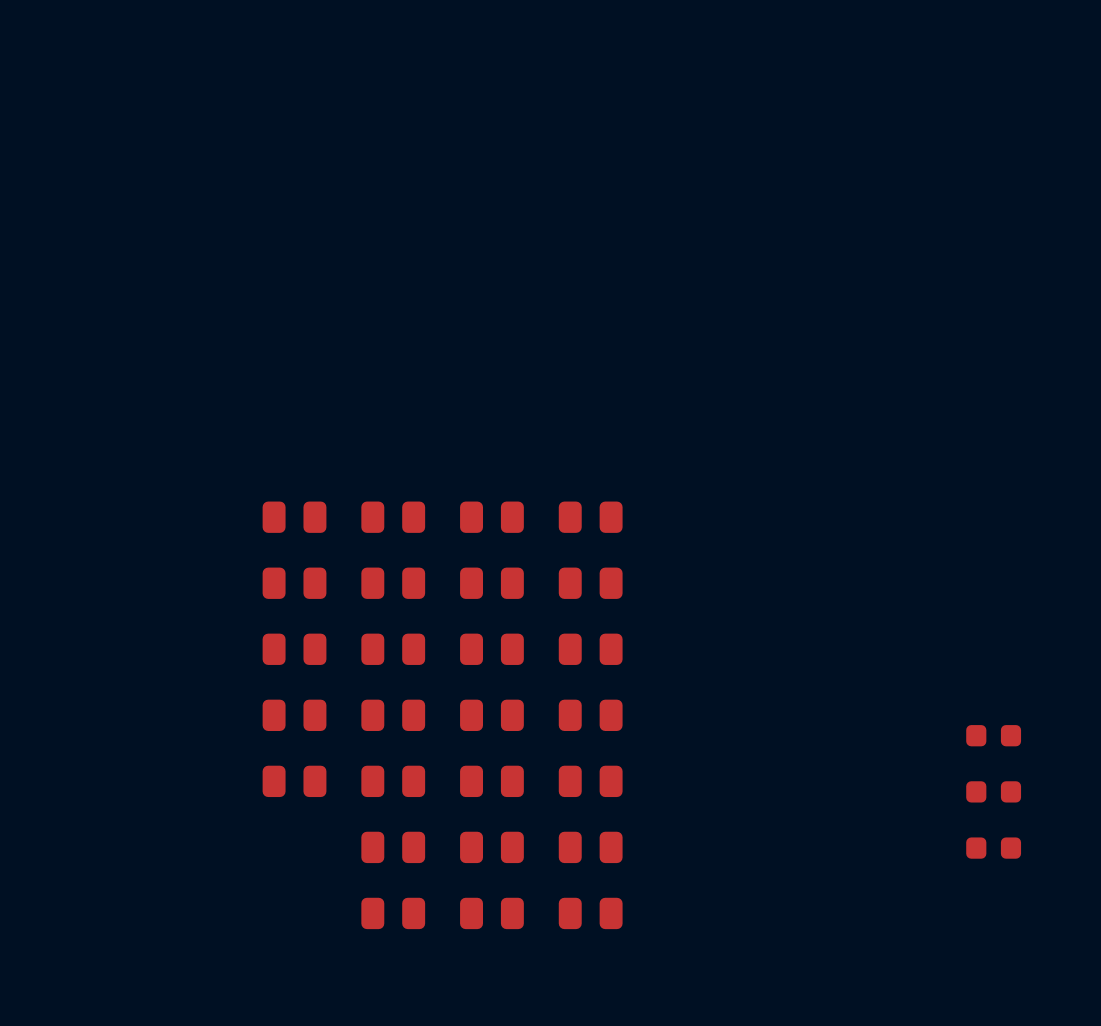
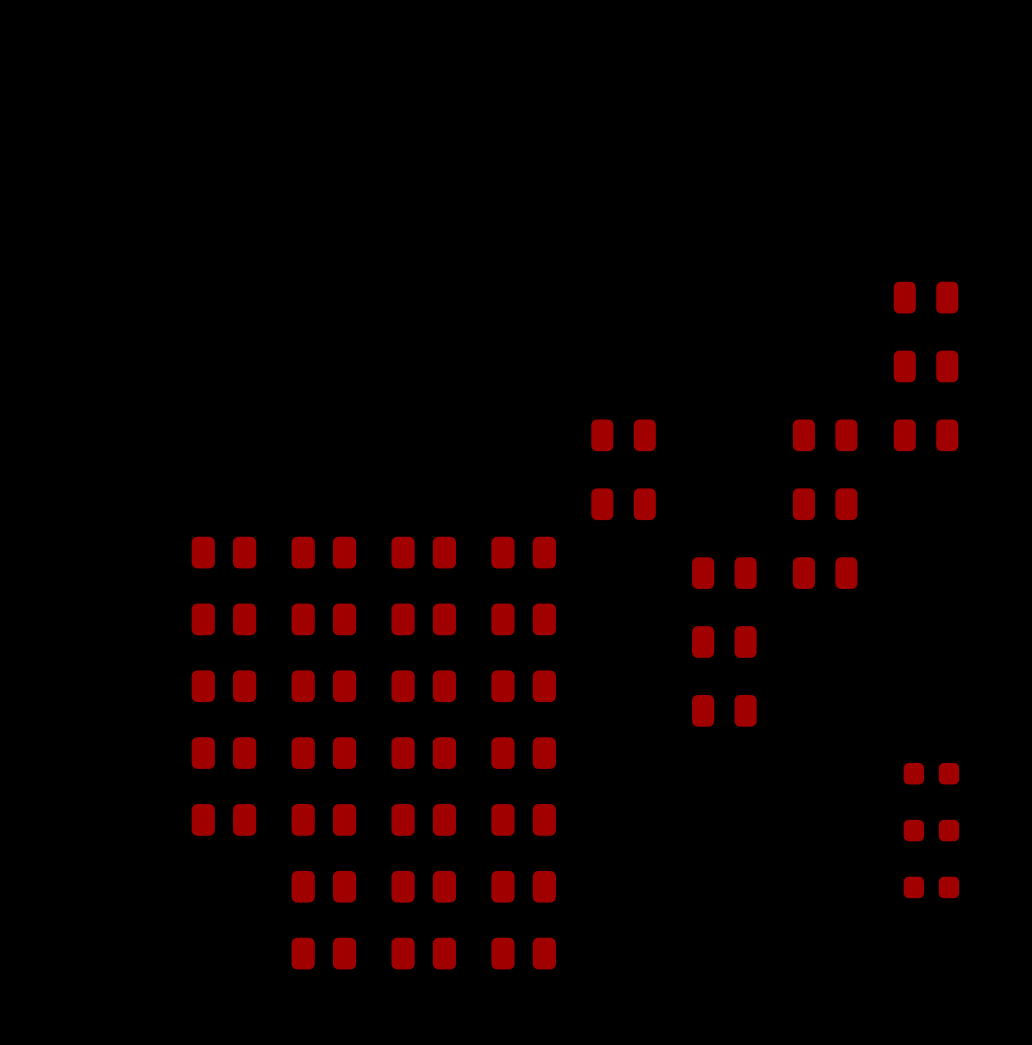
part: none -> (925, 297)
part: none -> (925, 366)
part: none -> (623, 435)
part: none -> (825, 435)
part: none -> (925, 435)
part: none -> (623, 504)
part: none -> (825, 504)
part: none -> (724, 573)
part: none -> (825, 573)
part: none -> (724, 641)
part: none -> (724, 710)

